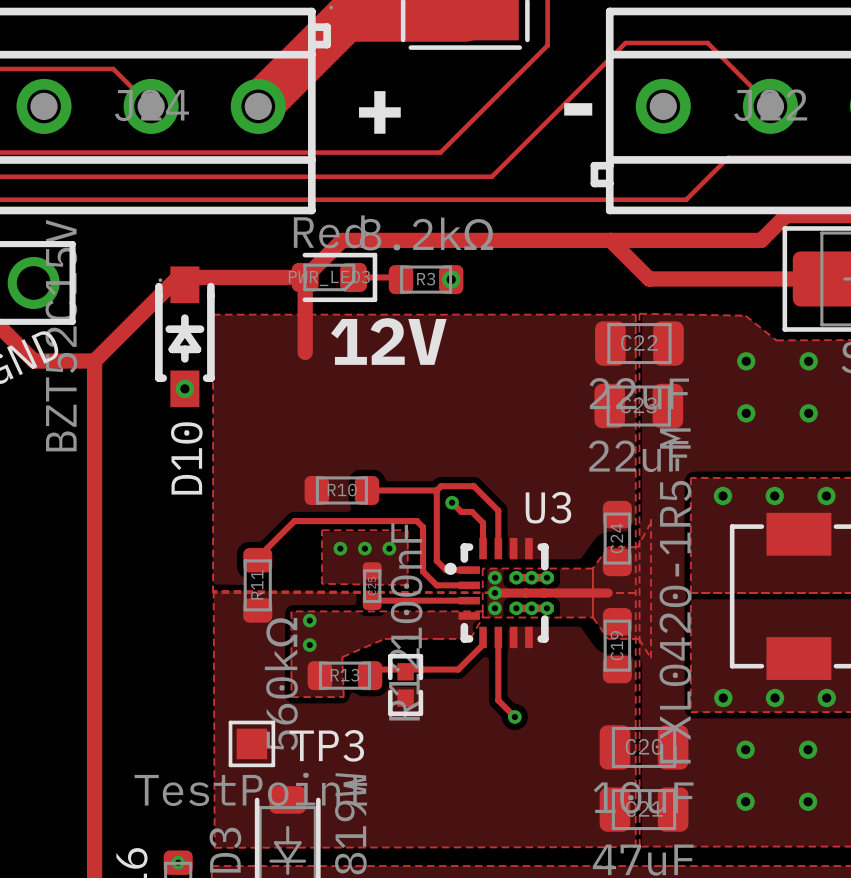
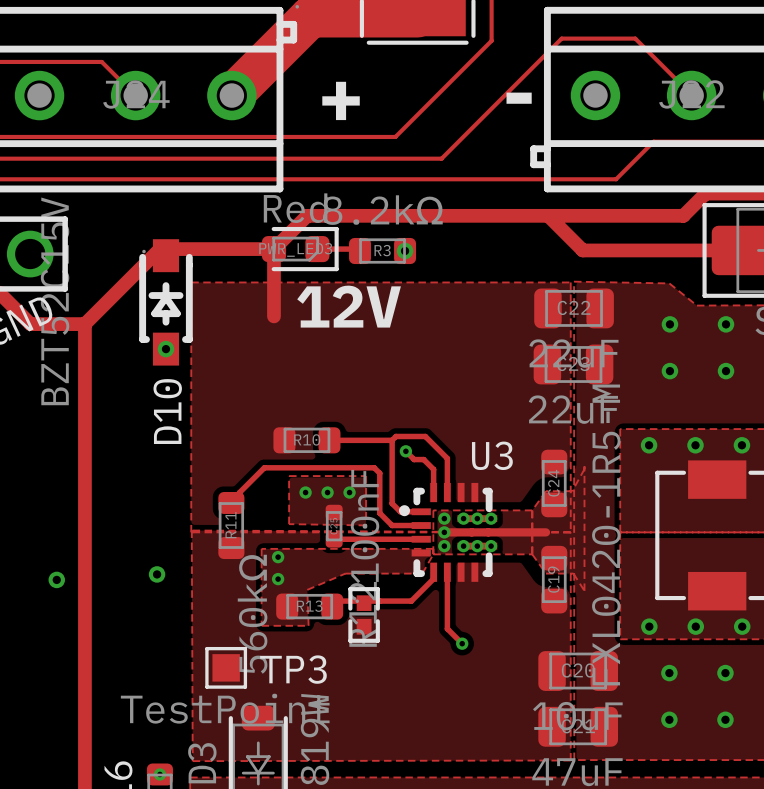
via: none -> (157, 574)
via: none -> (56, 579)

